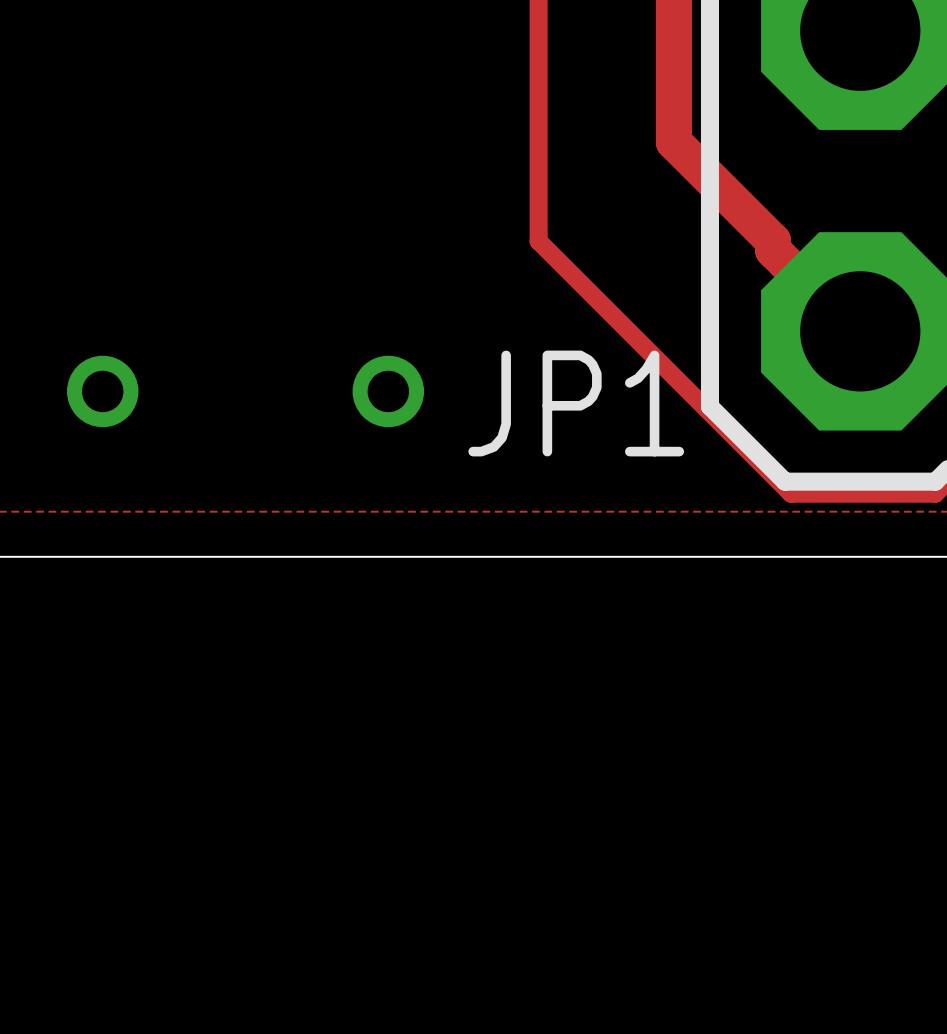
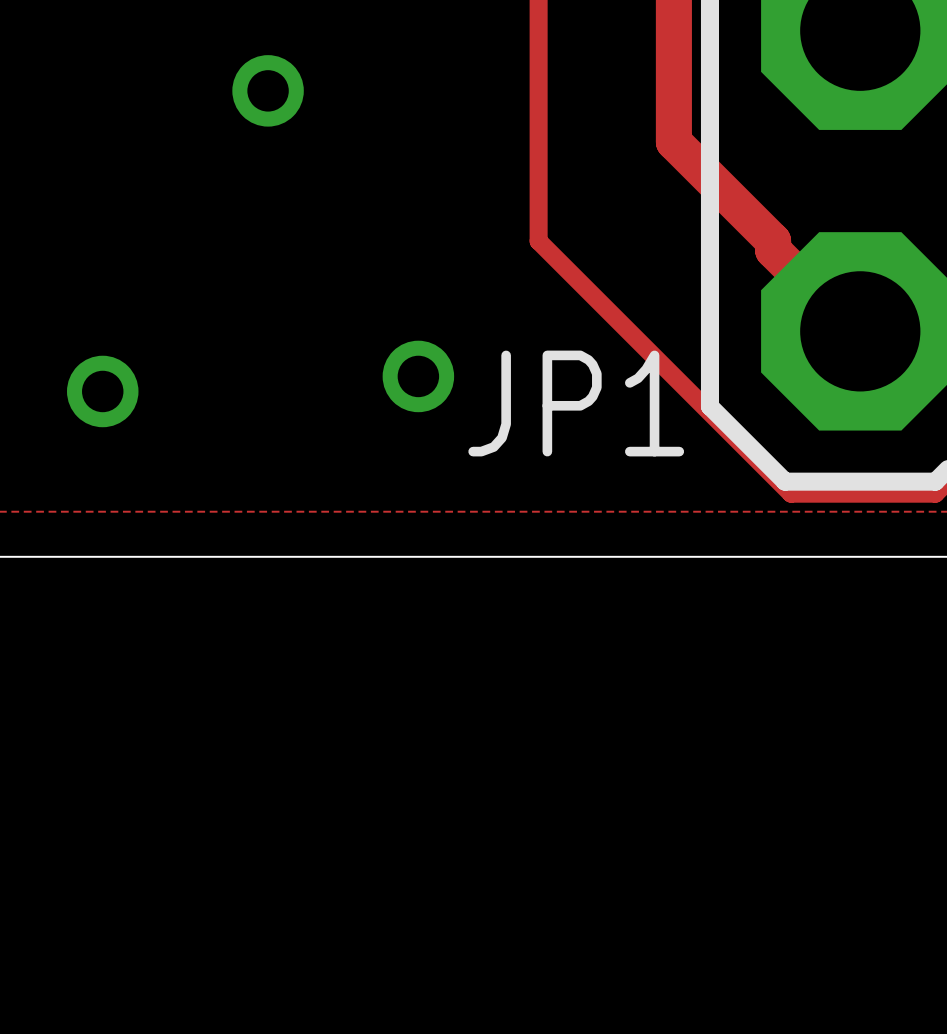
via: none -> (268, 90)
via position: (388, 391) -> (418, 376)

